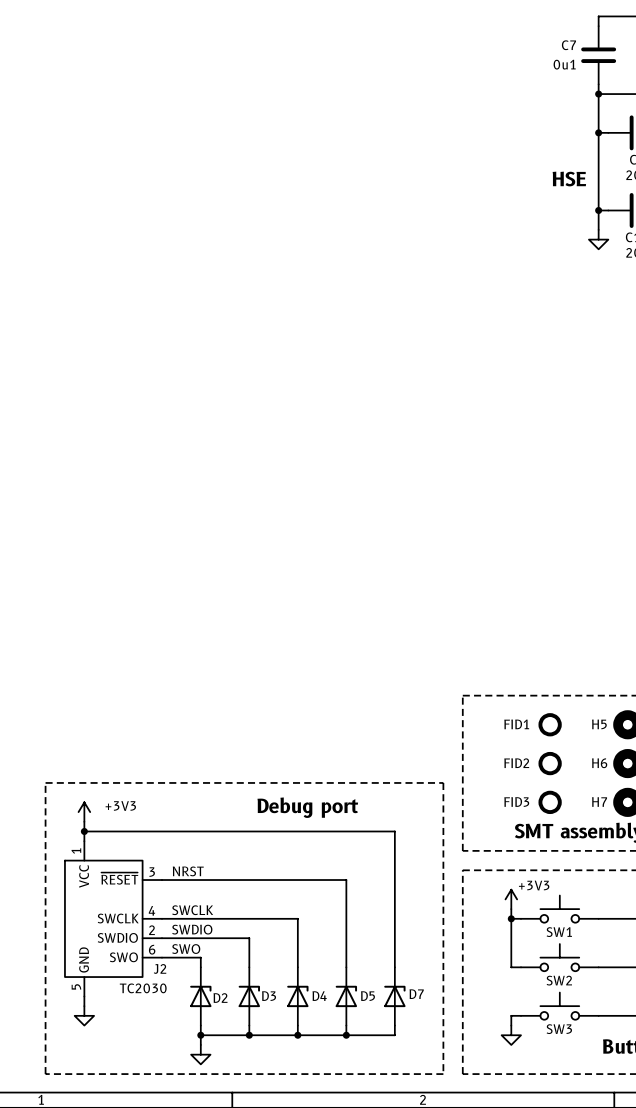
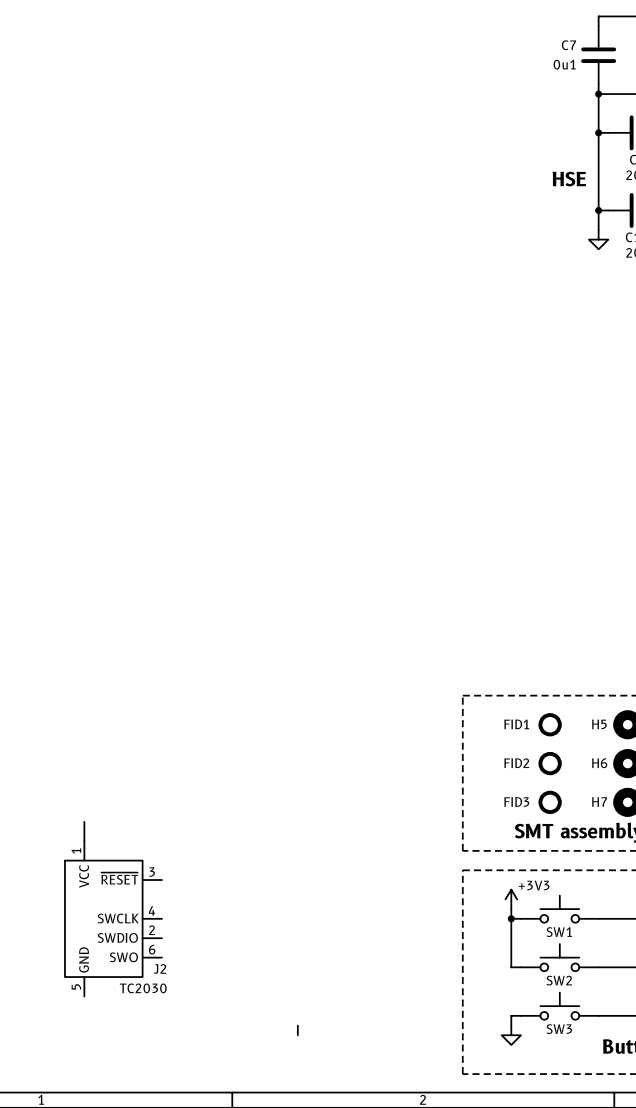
line: (45, 782) (443, 782) (443, 1074) (45, 1074) (45, 782) -> none
text: Debug port (307, 807) -> none
power symbol: +3V3 (84, 812) -> none
wire: (84, 831) (394, 831) (394, 967) -> none
junction: (84, 831) -> none
label: NRST (188, 871) -> none
wire: (162, 880) (346, 880) (346, 967) -> none
label: SWCLK (192, 910) -> none
wire: (162, 918) (297, 918) (297, 967) -> none
label: SWDIO (192, 929) -> none
wire: (162, 938) (249, 938) (249, 967) -> none
label: SWO (186, 949) -> none
wire: (162, 957) (200, 957) (200, 967) -> none
wire: (84, 996) (84, 1006) -> none
D2: (200, 996) -> none
D3: (249, 996) -> none
D4: (297, 996) -> none
D5: (346, 996) -> none
D7: (394, 996) -> none
power symbol: (84, 1015) -> none
wire: (200, 1025) (200, 1044) -> none
wire: (249, 1025) (249, 1035) -> none
wire: (346, 1025) (346, 1035) -> none
wire: (394, 1025) (394, 1035) (200, 1035) -> none
junction: (200, 1035) -> none
junction: (249, 1035) -> none
junction: (297, 1035) -> none
junction: (346, 1035) -> none
power symbol: (200, 1054) -> none

